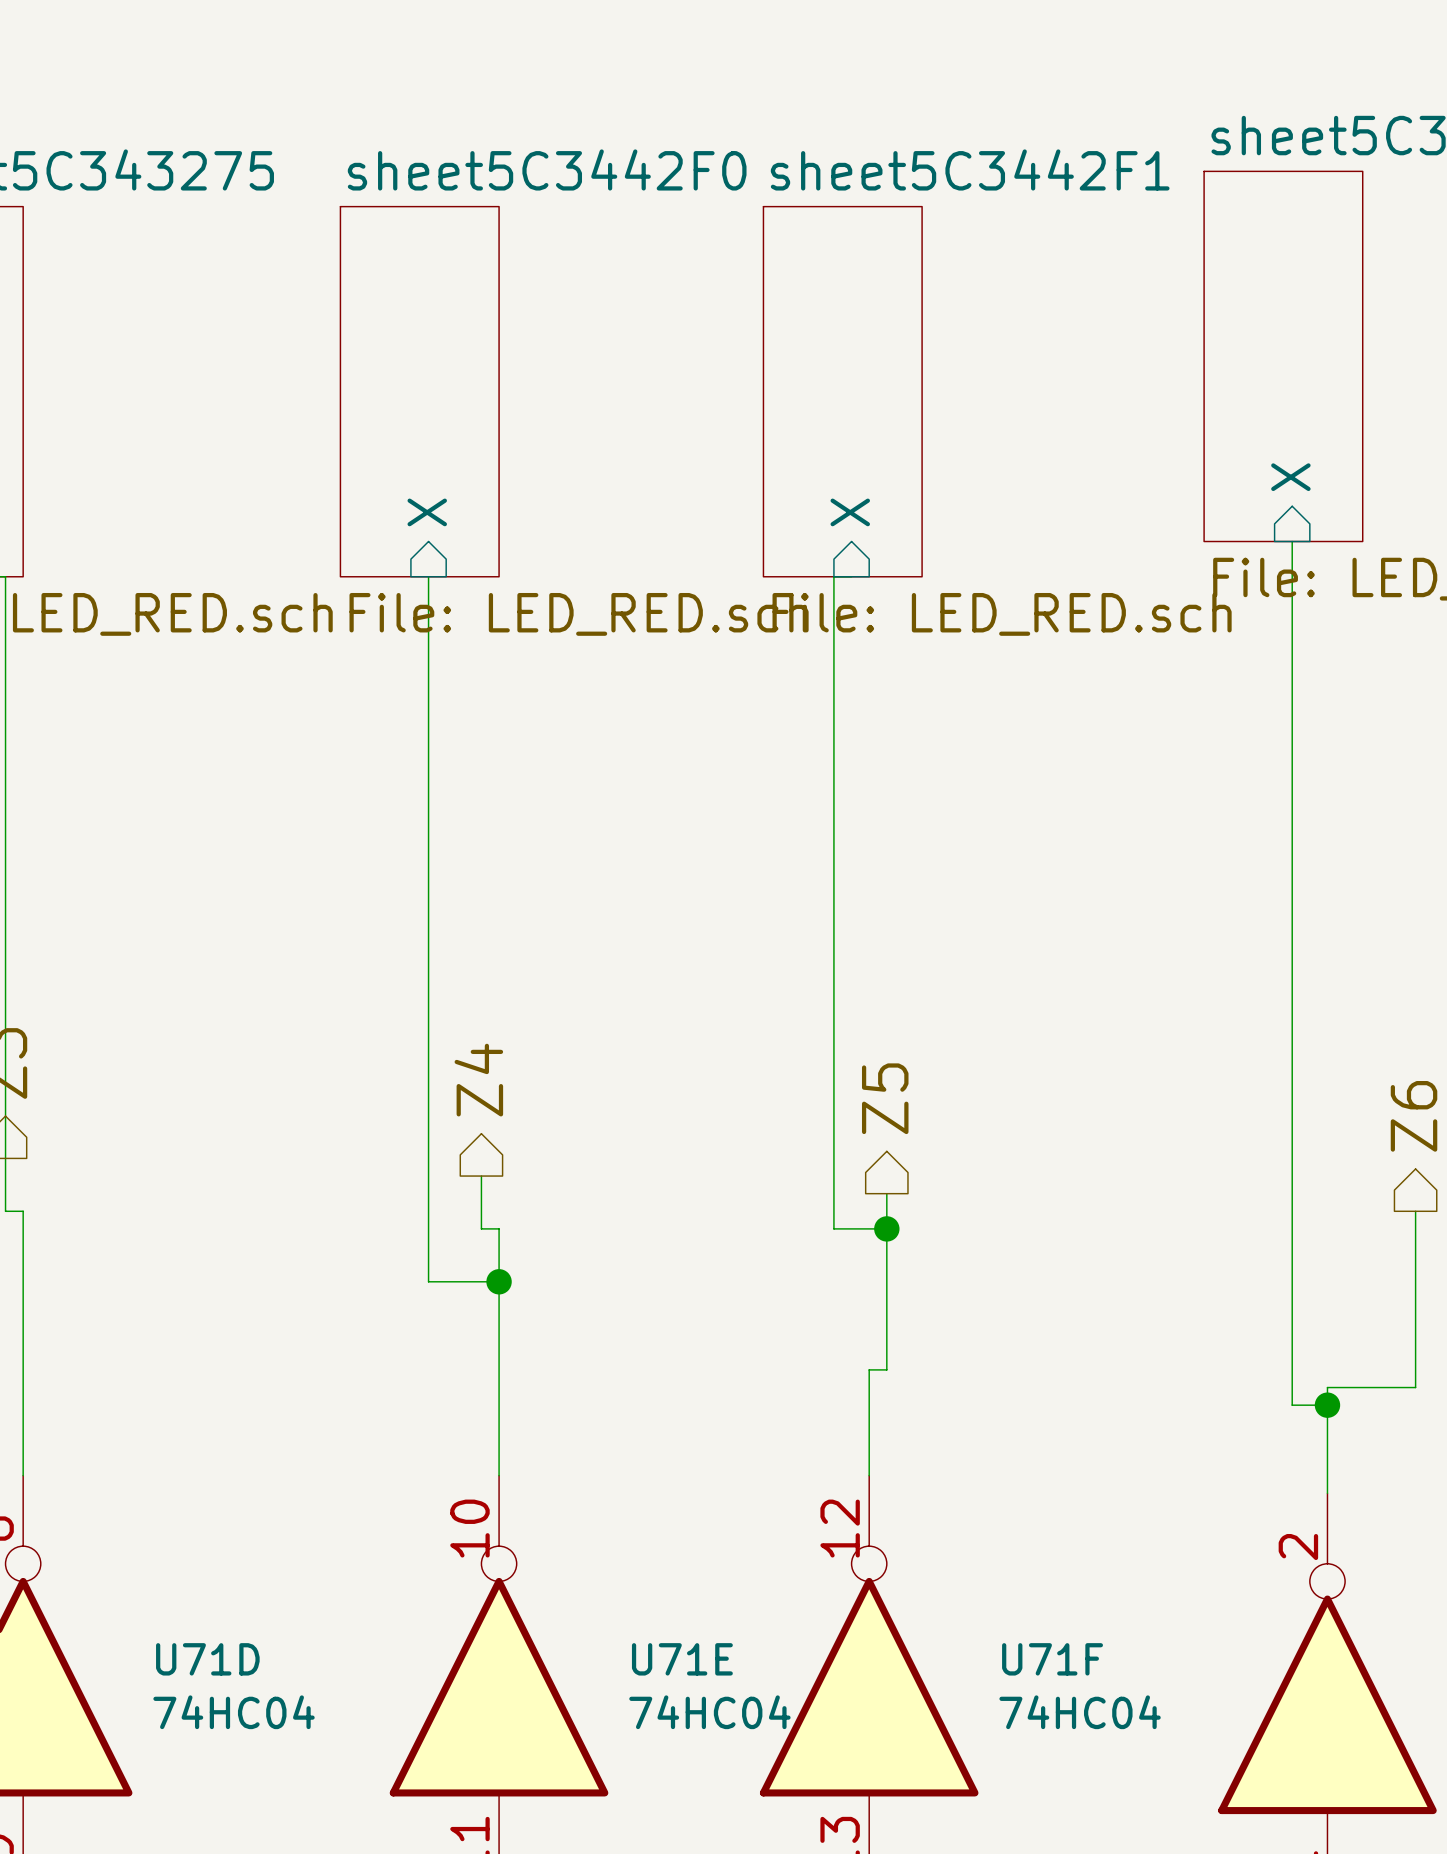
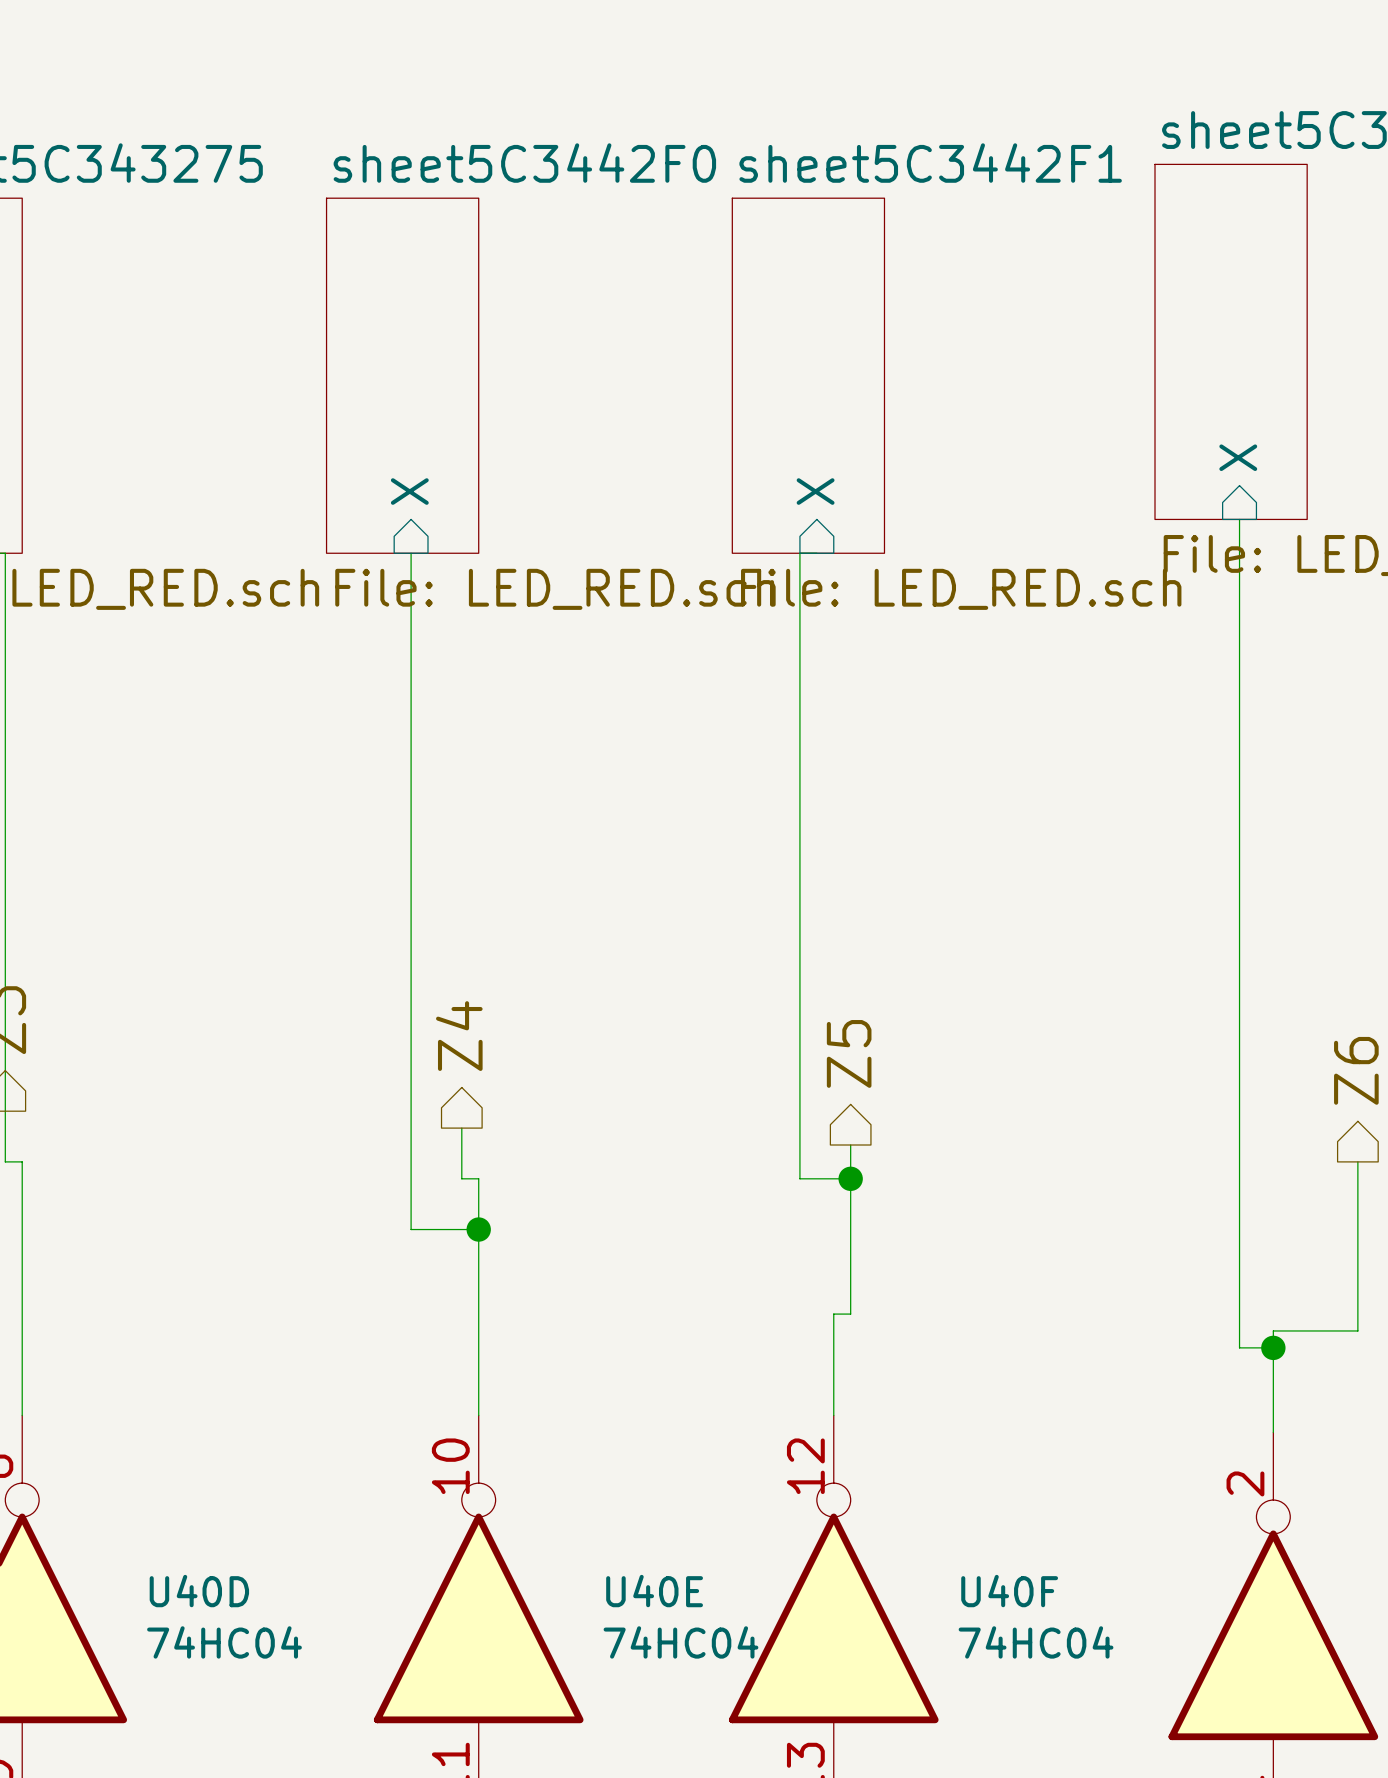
U71D name: U71D (207, 1659) -> U40D (199, 1591)
U71E name: U71E (682, 1659) -> U40E (654, 1591)
U71F name: U71F (1052, 1659) -> U40F (1009, 1591)

